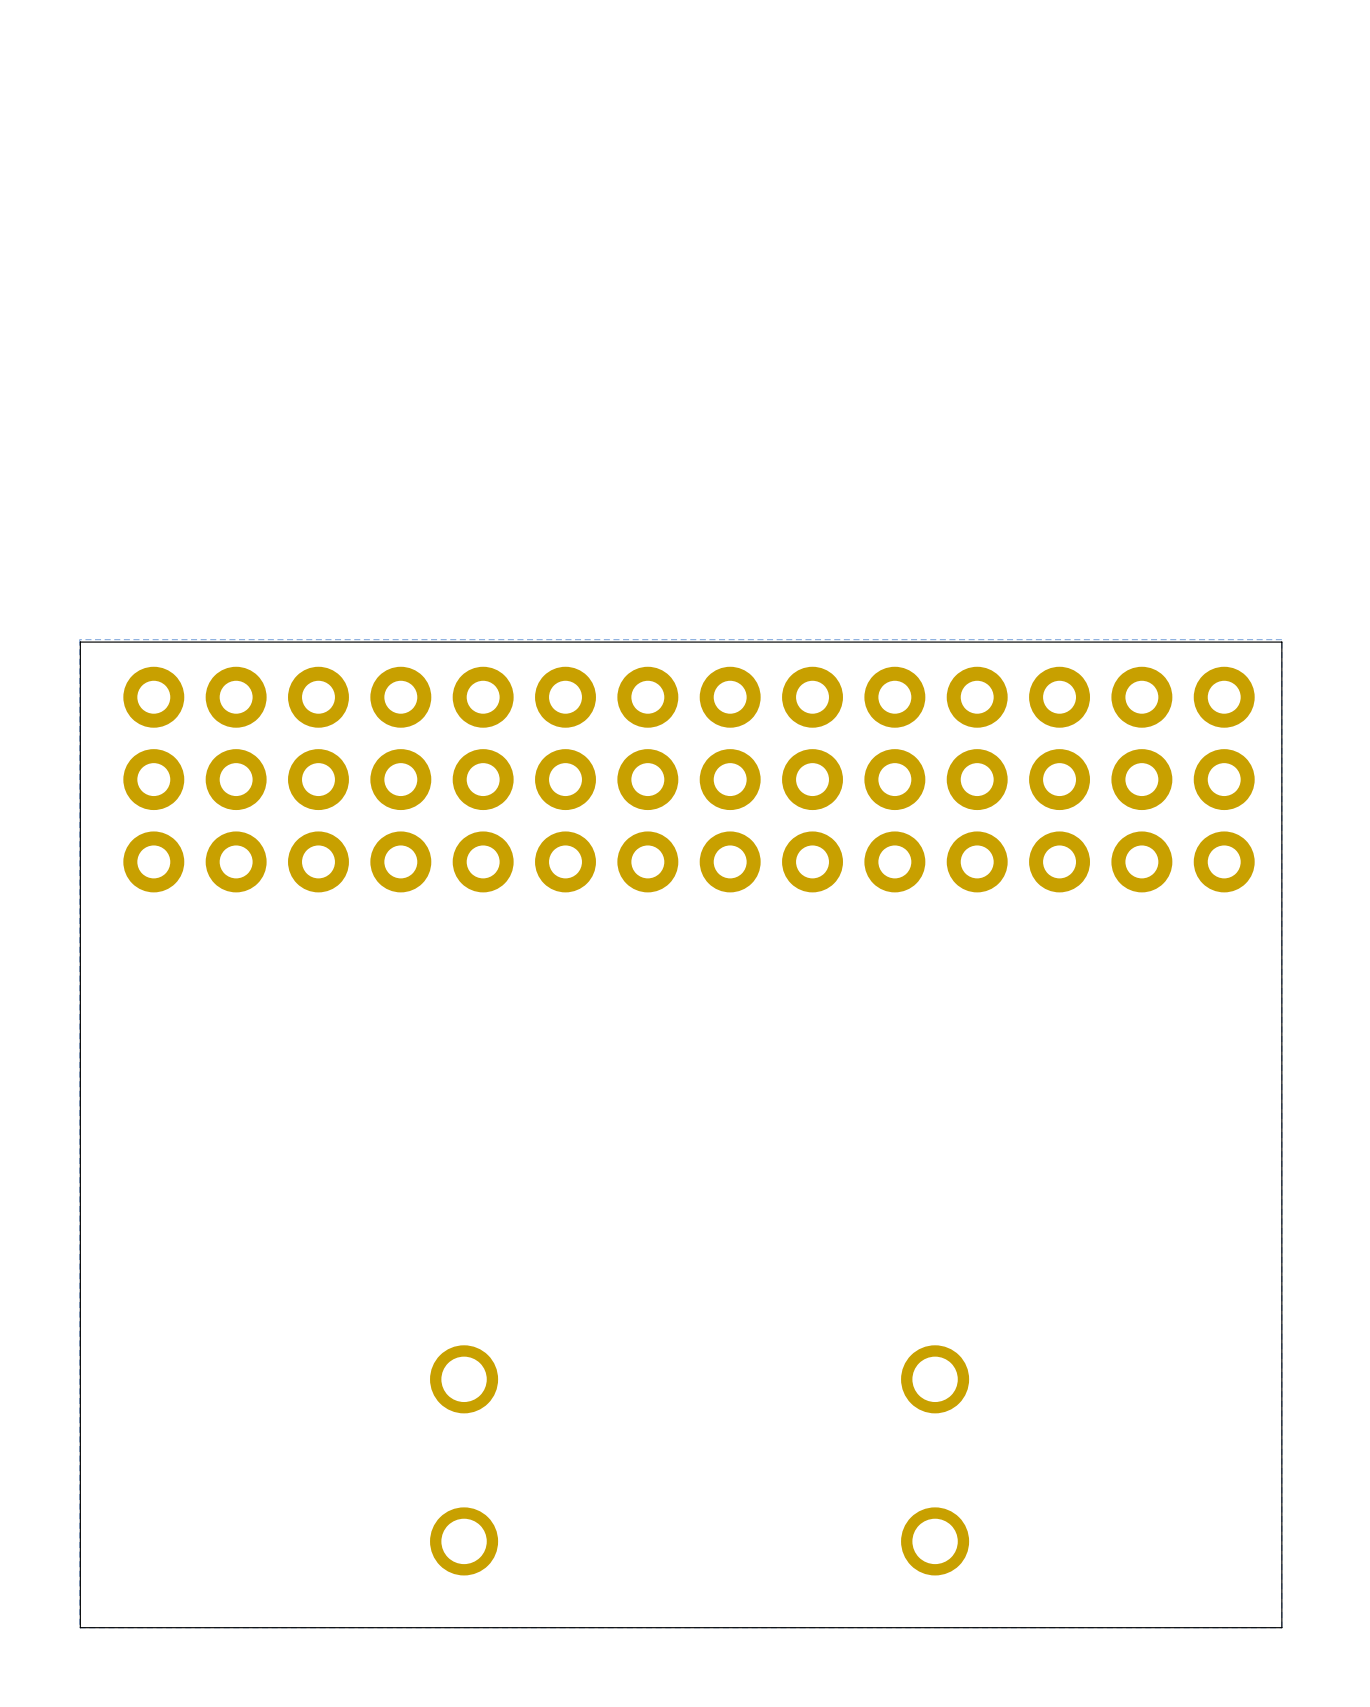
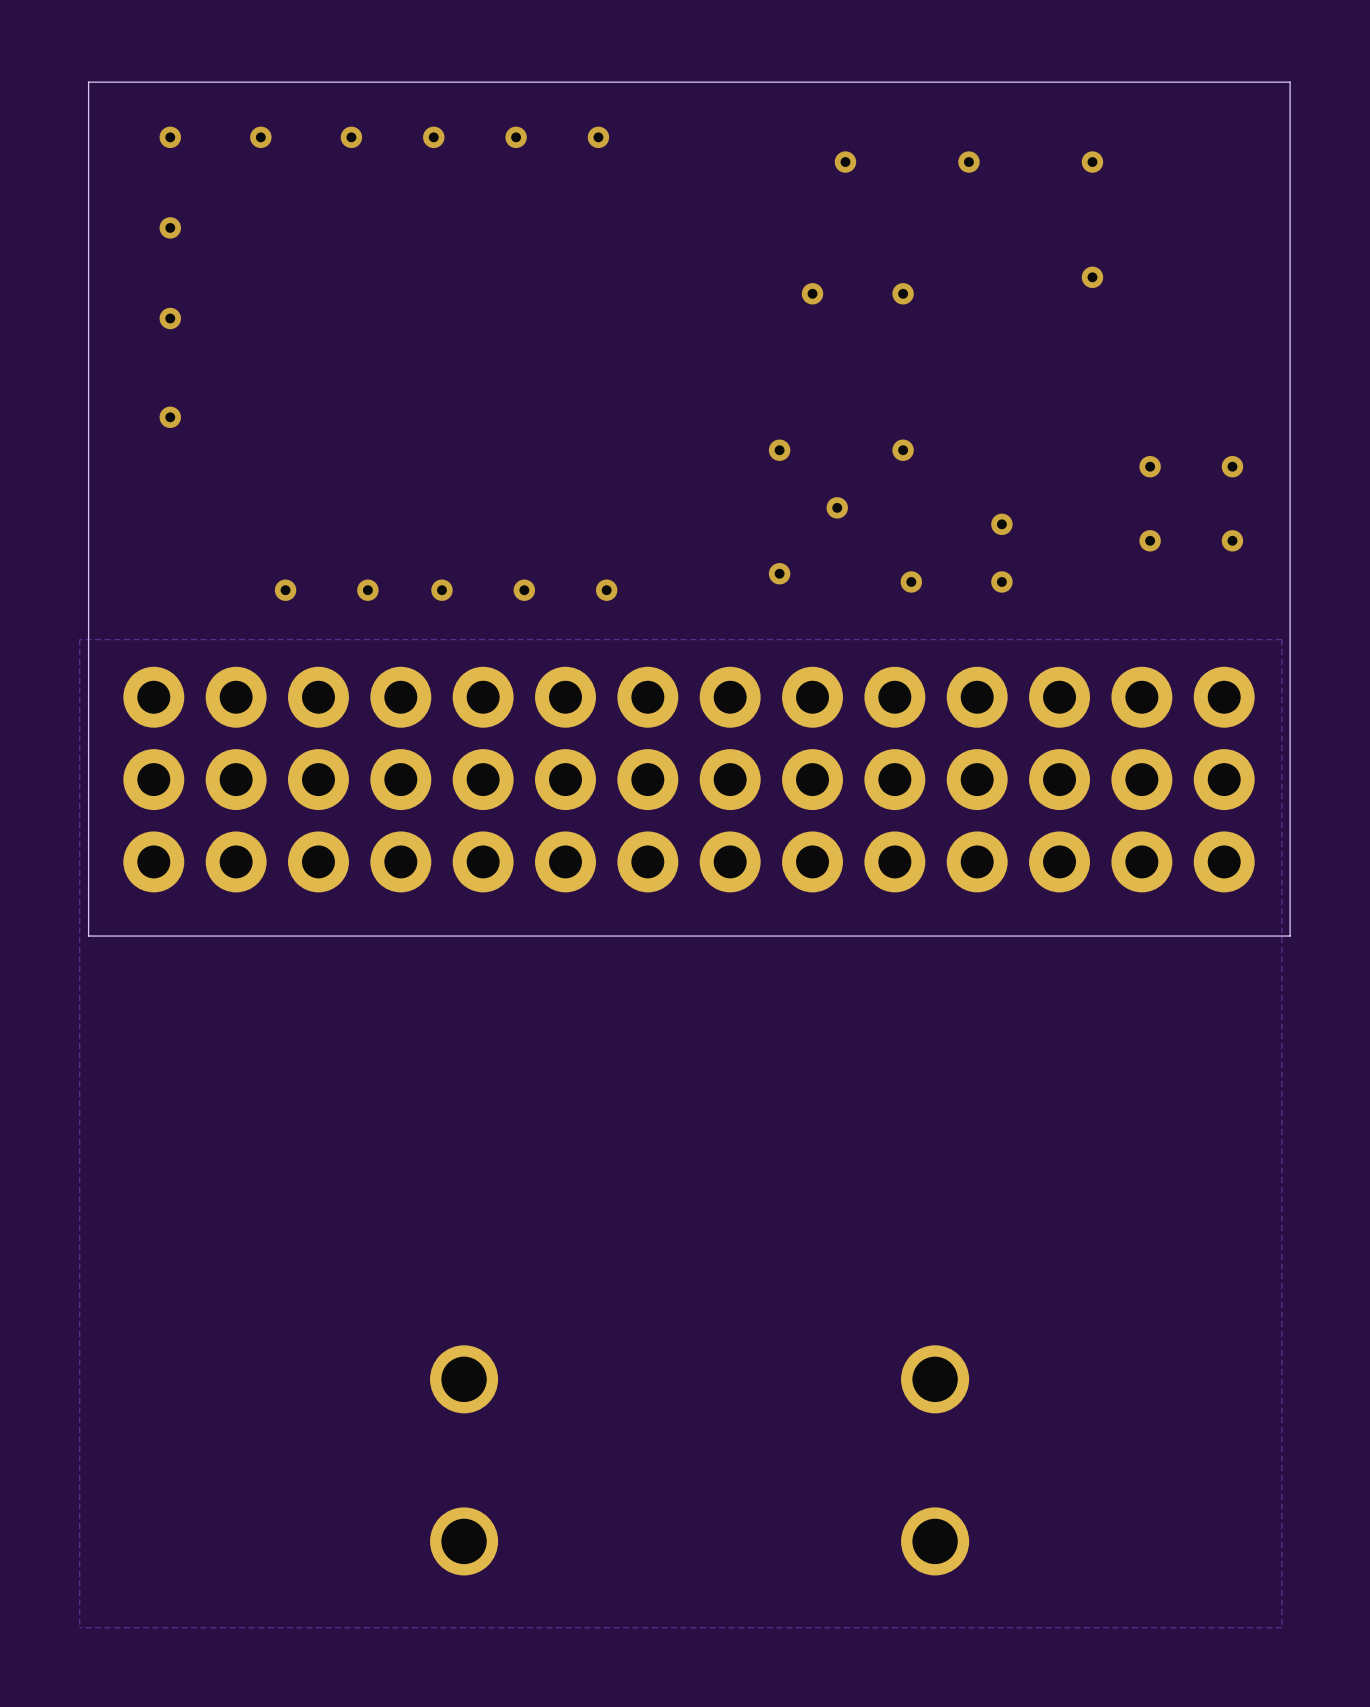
board edge: none -> (1290, 82) (88, 82) (88, 936) (1290, 936) (1290, 82)
via: none -> (170, 137)
via: none -> (260, 137)
via: none -> (351, 137)
via: none -> (433, 137)
via: none -> (516, 137)
via: none -> (598, 137)
via: none -> (845, 162)
via: none -> (968, 162)
via: none -> (1092, 162)
via: none -> (170, 227)
via: none -> (1092, 277)
via: none -> (812, 293)
via: none -> (903, 293)
via: none -> (170, 318)
via: none -> (170, 417)
via: none -> (779, 450)
via: none -> (903, 450)
via: none -> (1150, 466)
via: none -> (1232, 466)
via: none -> (837, 507)
via: none -> (1001, 524)
via: none -> (1150, 540)
via: none -> (1232, 540)
via: none -> (779, 573)
via: none -> (911, 581)
via: none -> (1001, 581)
via: none -> (285, 590)
via: none -> (367, 590)
via: none -> (441, 590)
via: none -> (524, 590)
via: none -> (606, 590)
board edge: (1281, 642) (80, 642) (80, 1627) (1281, 1627) (1281, 642) -> none

